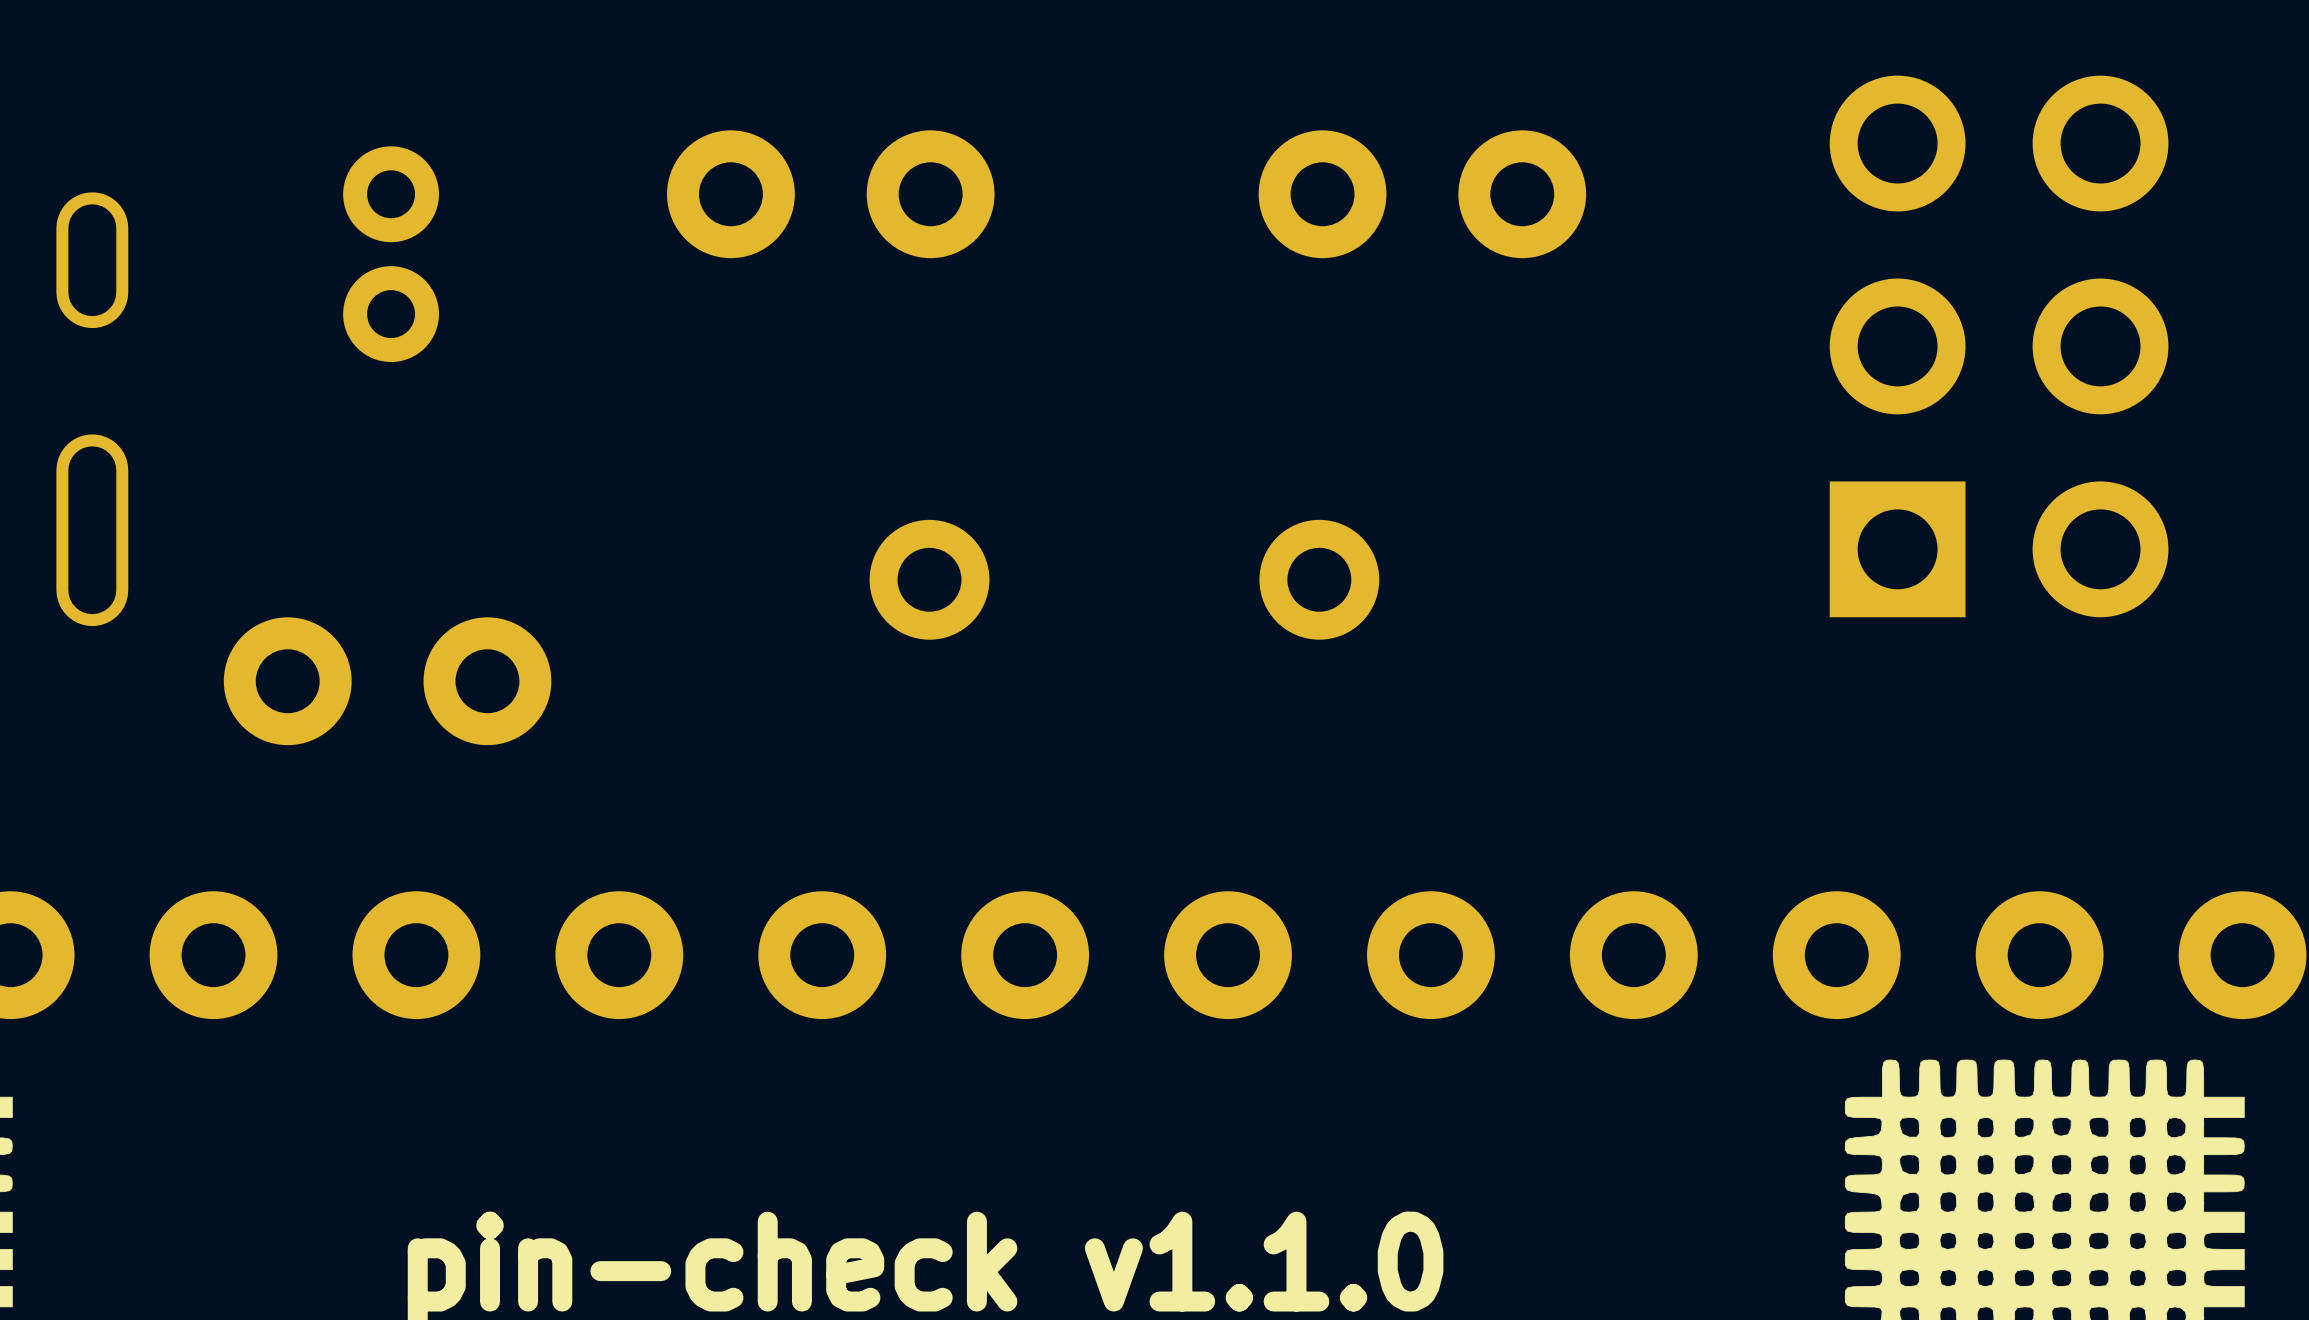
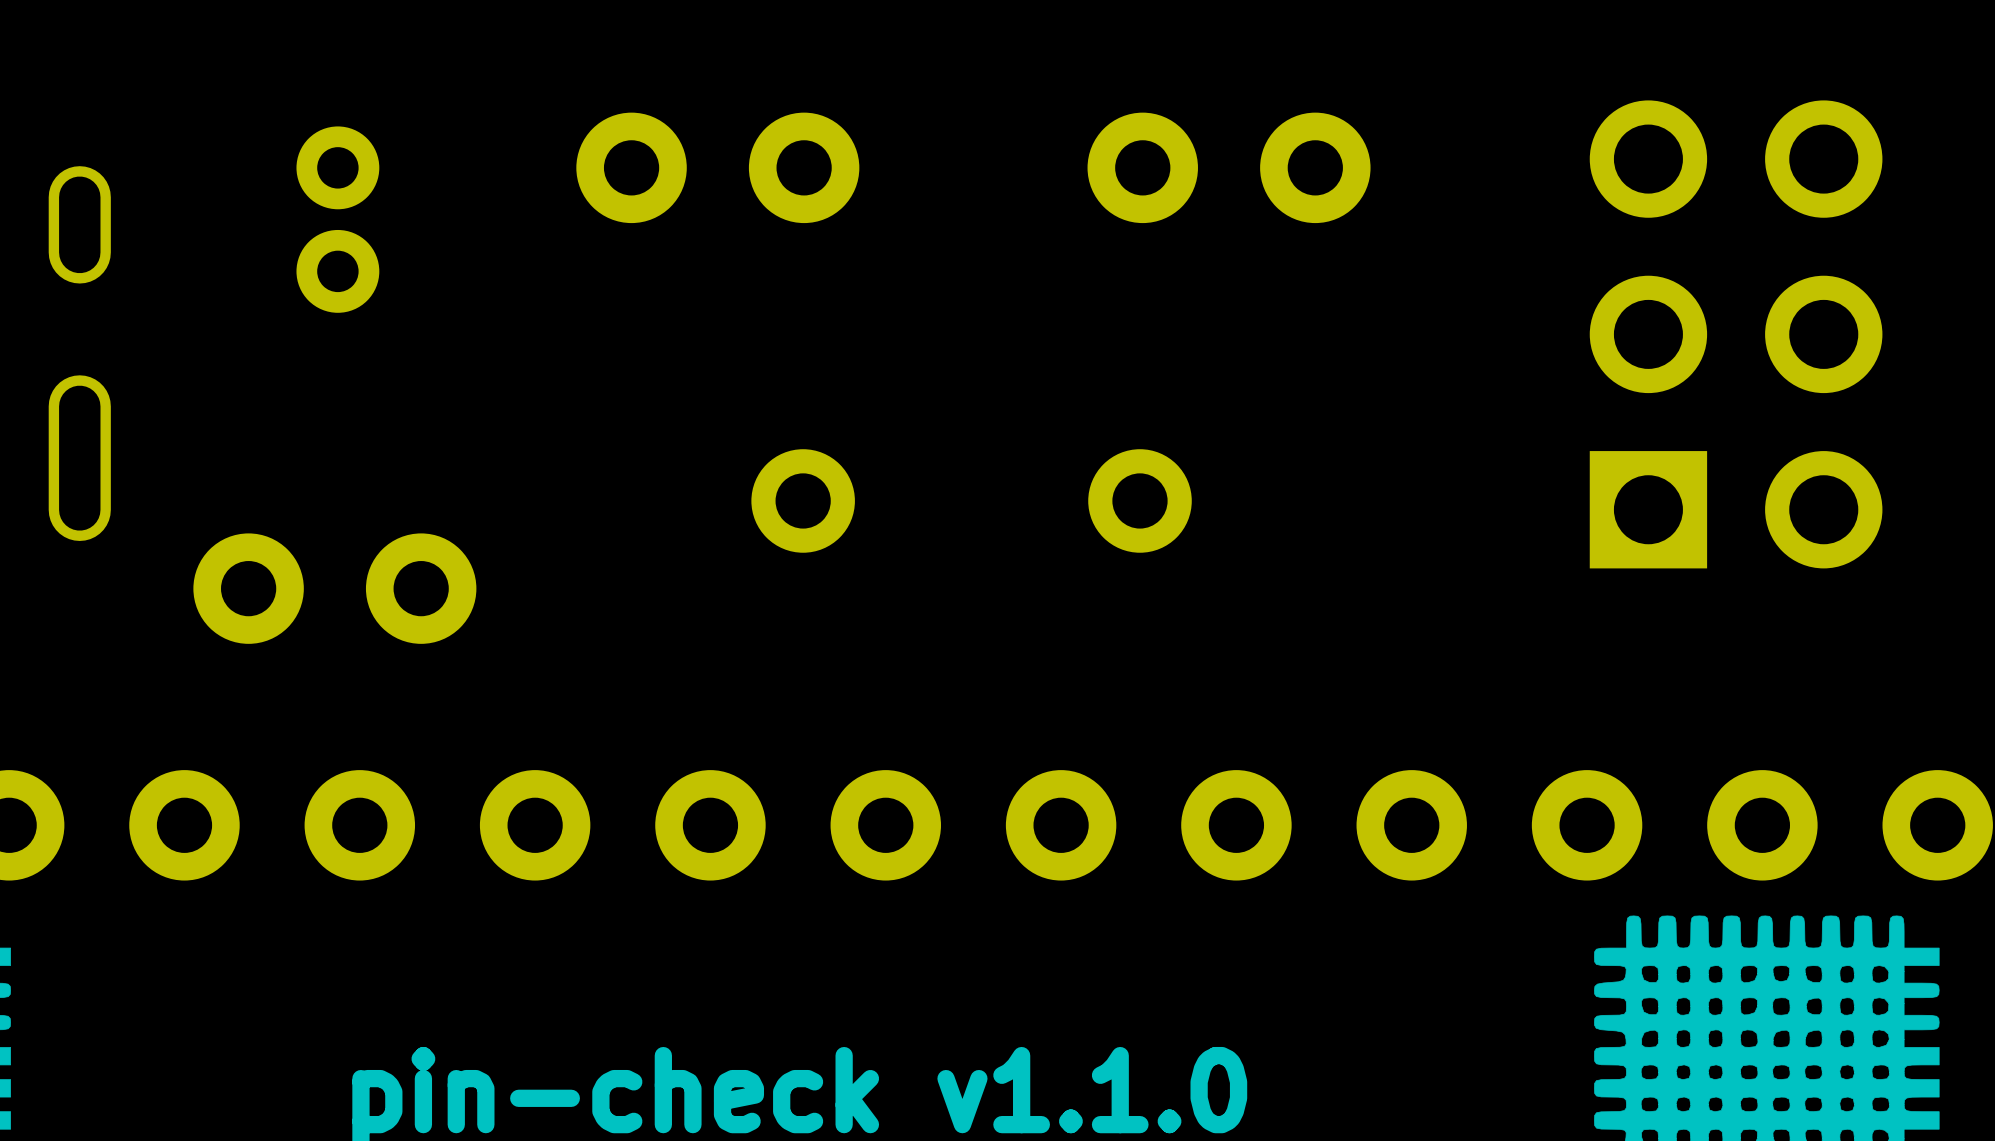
part position: (1999, 346) -> (1736, 334)

